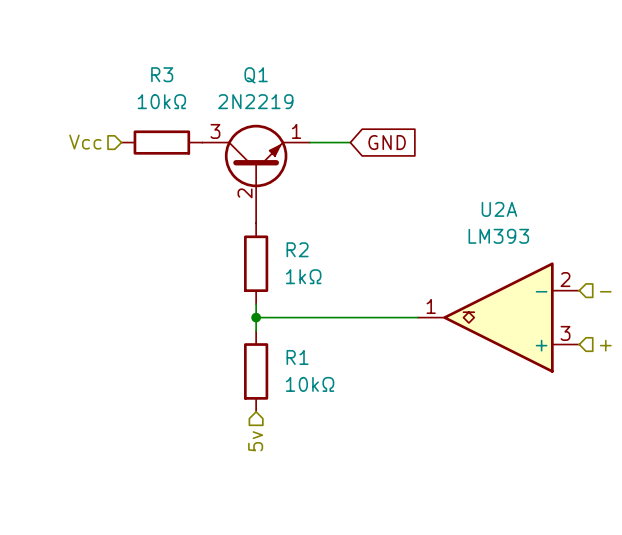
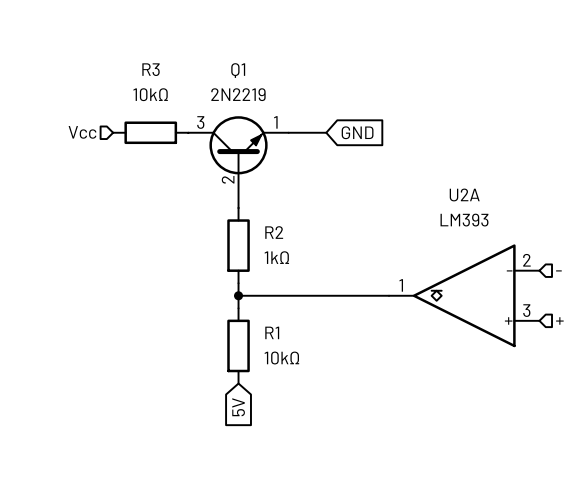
global label: none -> 5V (238, 407)
hierarchical label: 5v (255, 441) -> none

